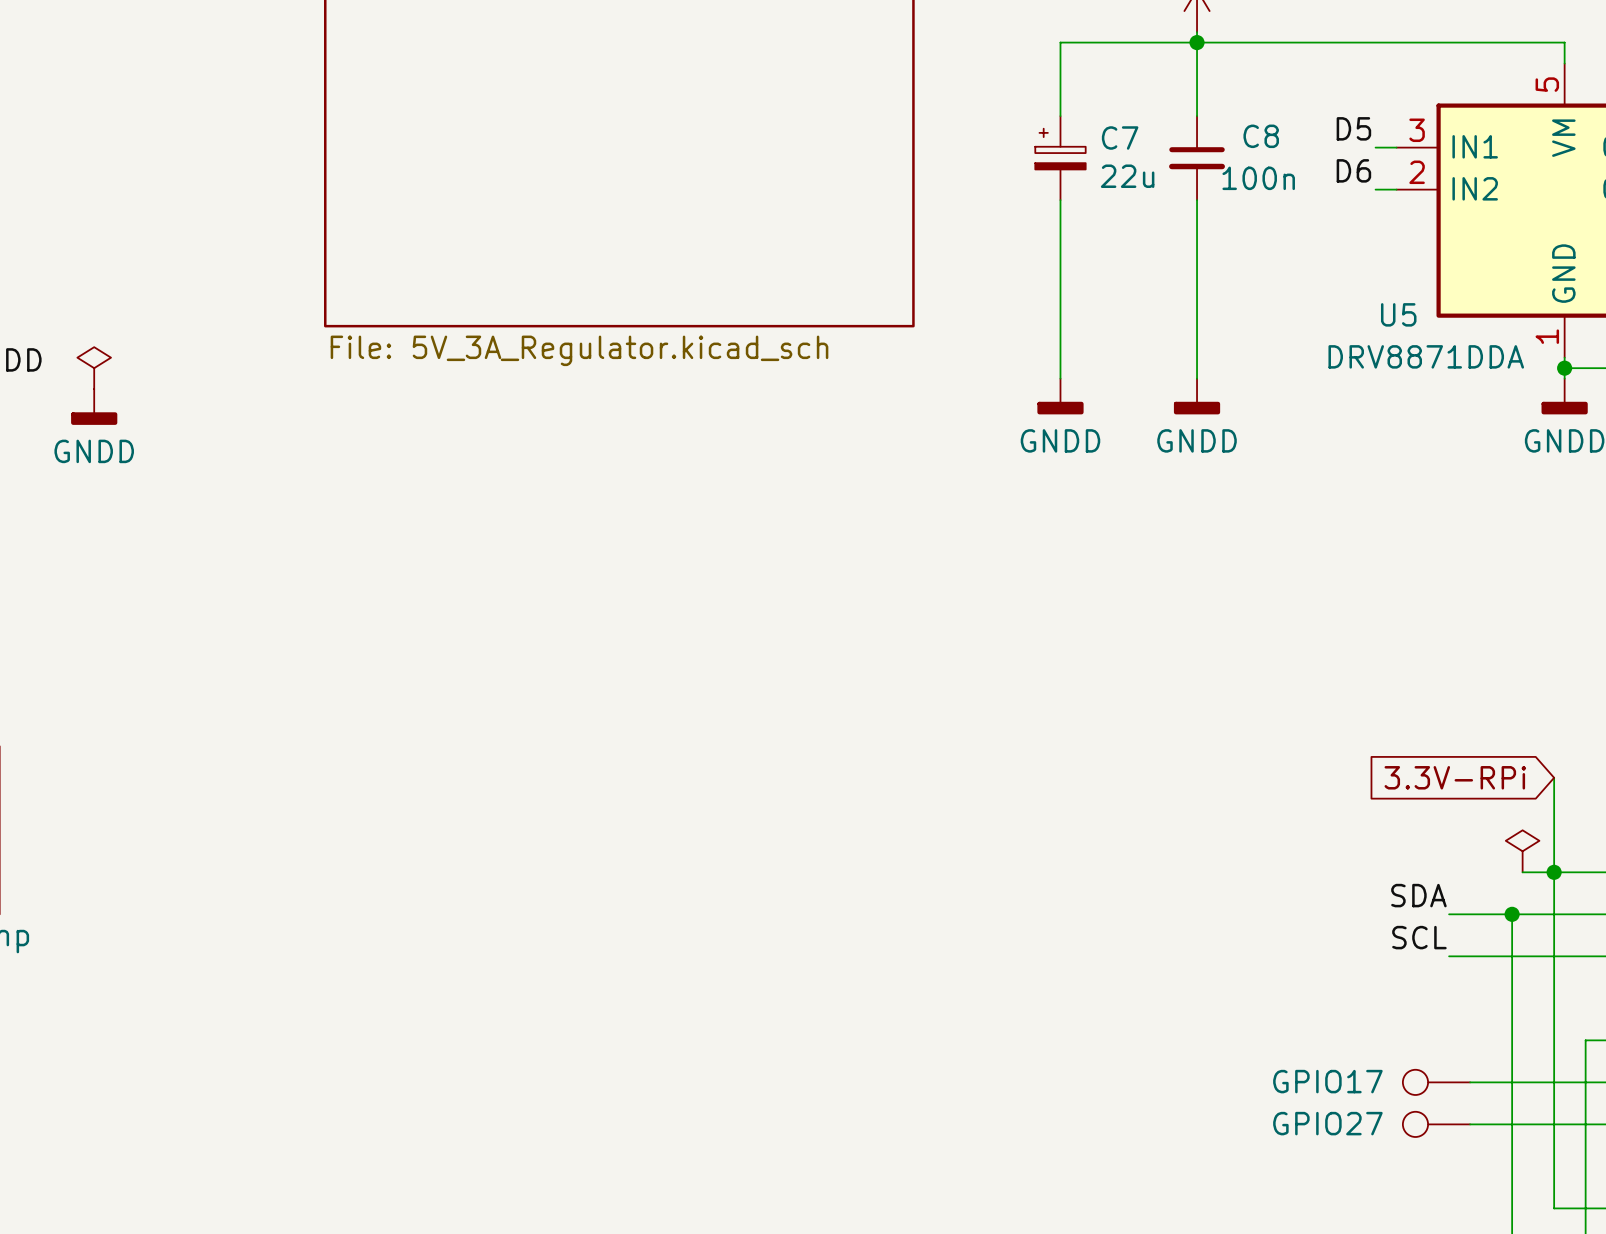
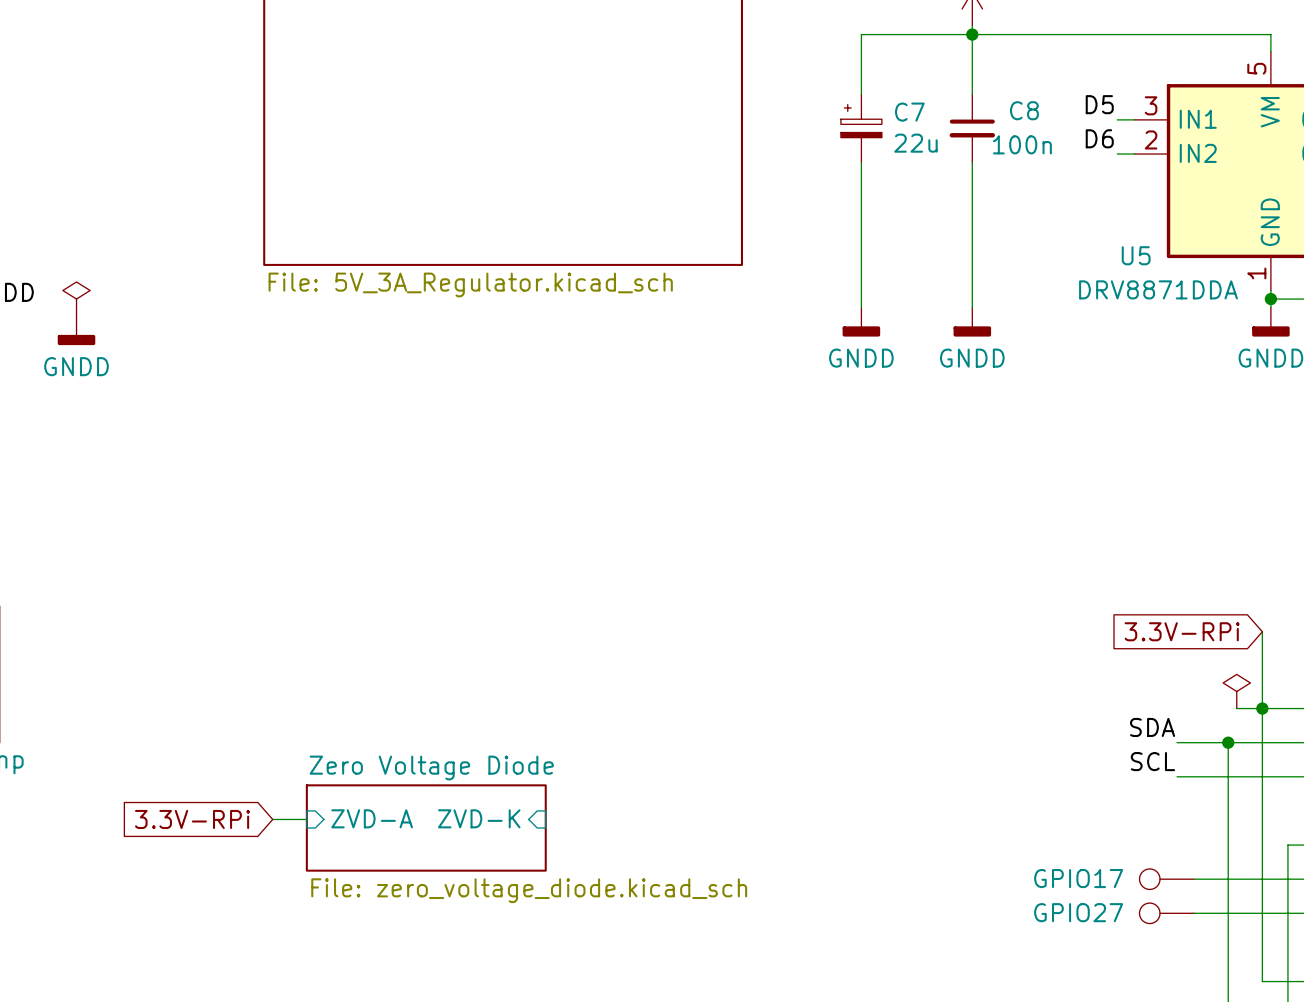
global label: none -> 3.3V-RPi (192, 819)
wire: none -> (272, 819) (306, 819)
sheet pin: none -> ZVD-A (372, 818)
sheet pin: none -> ZVD-K (479, 818)
sheet Zero Voltage Diode: none -> File: zero_voltage_diode.kicad_sch (426, 827)

